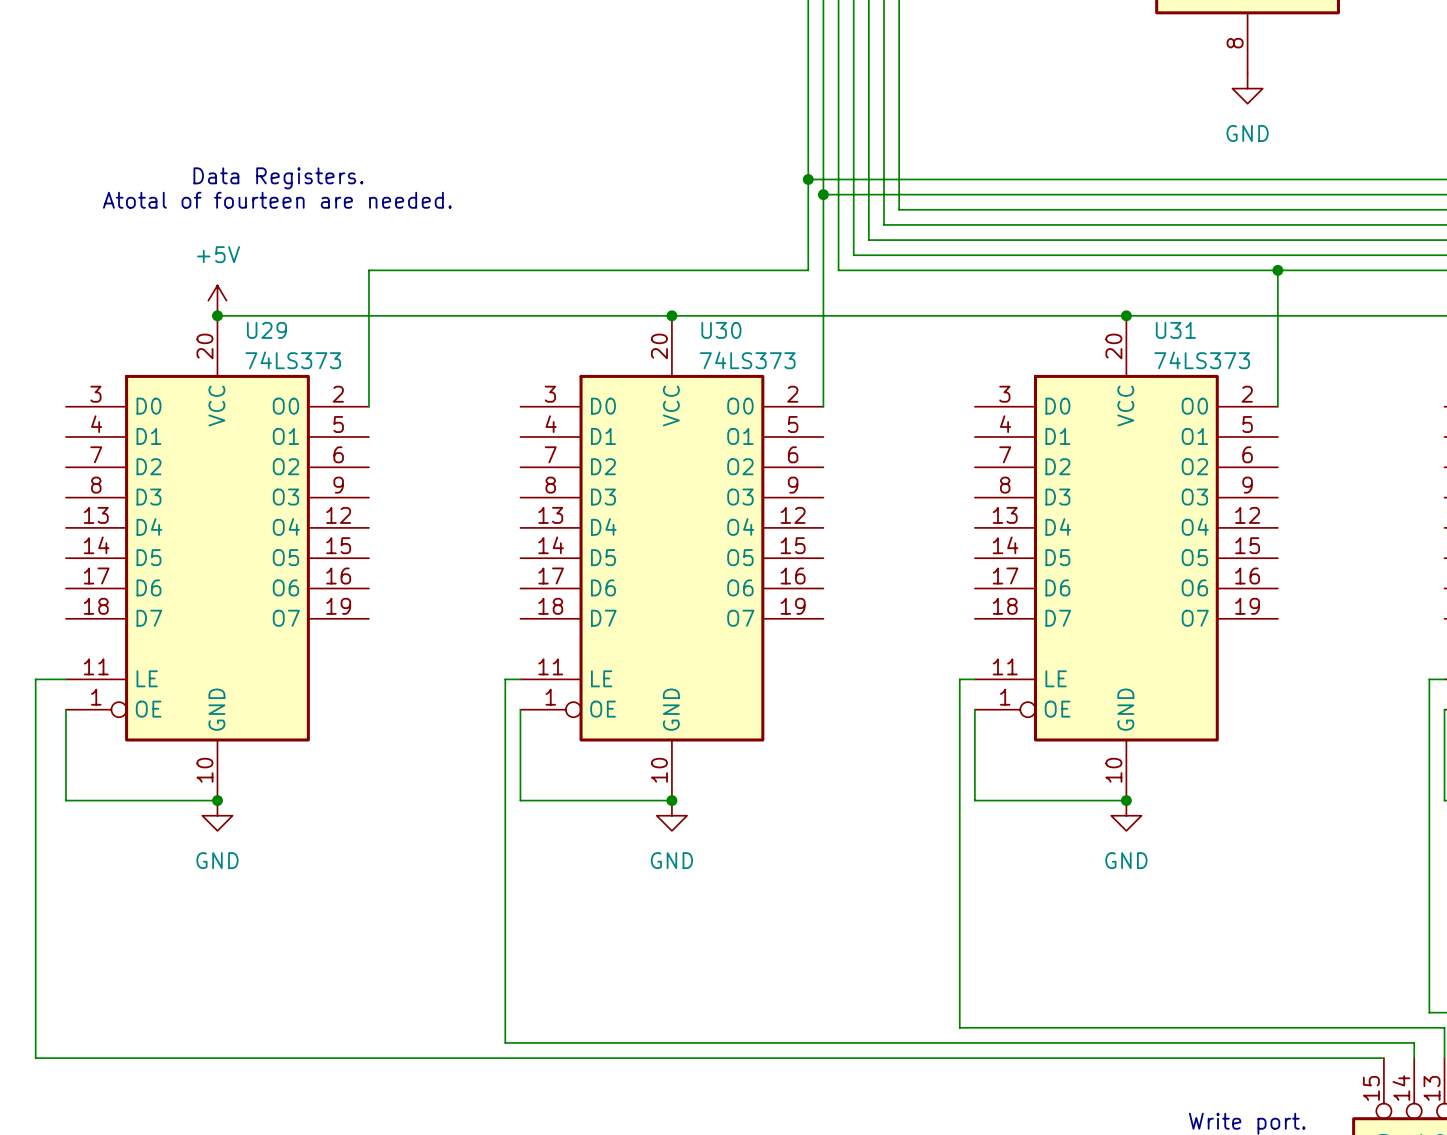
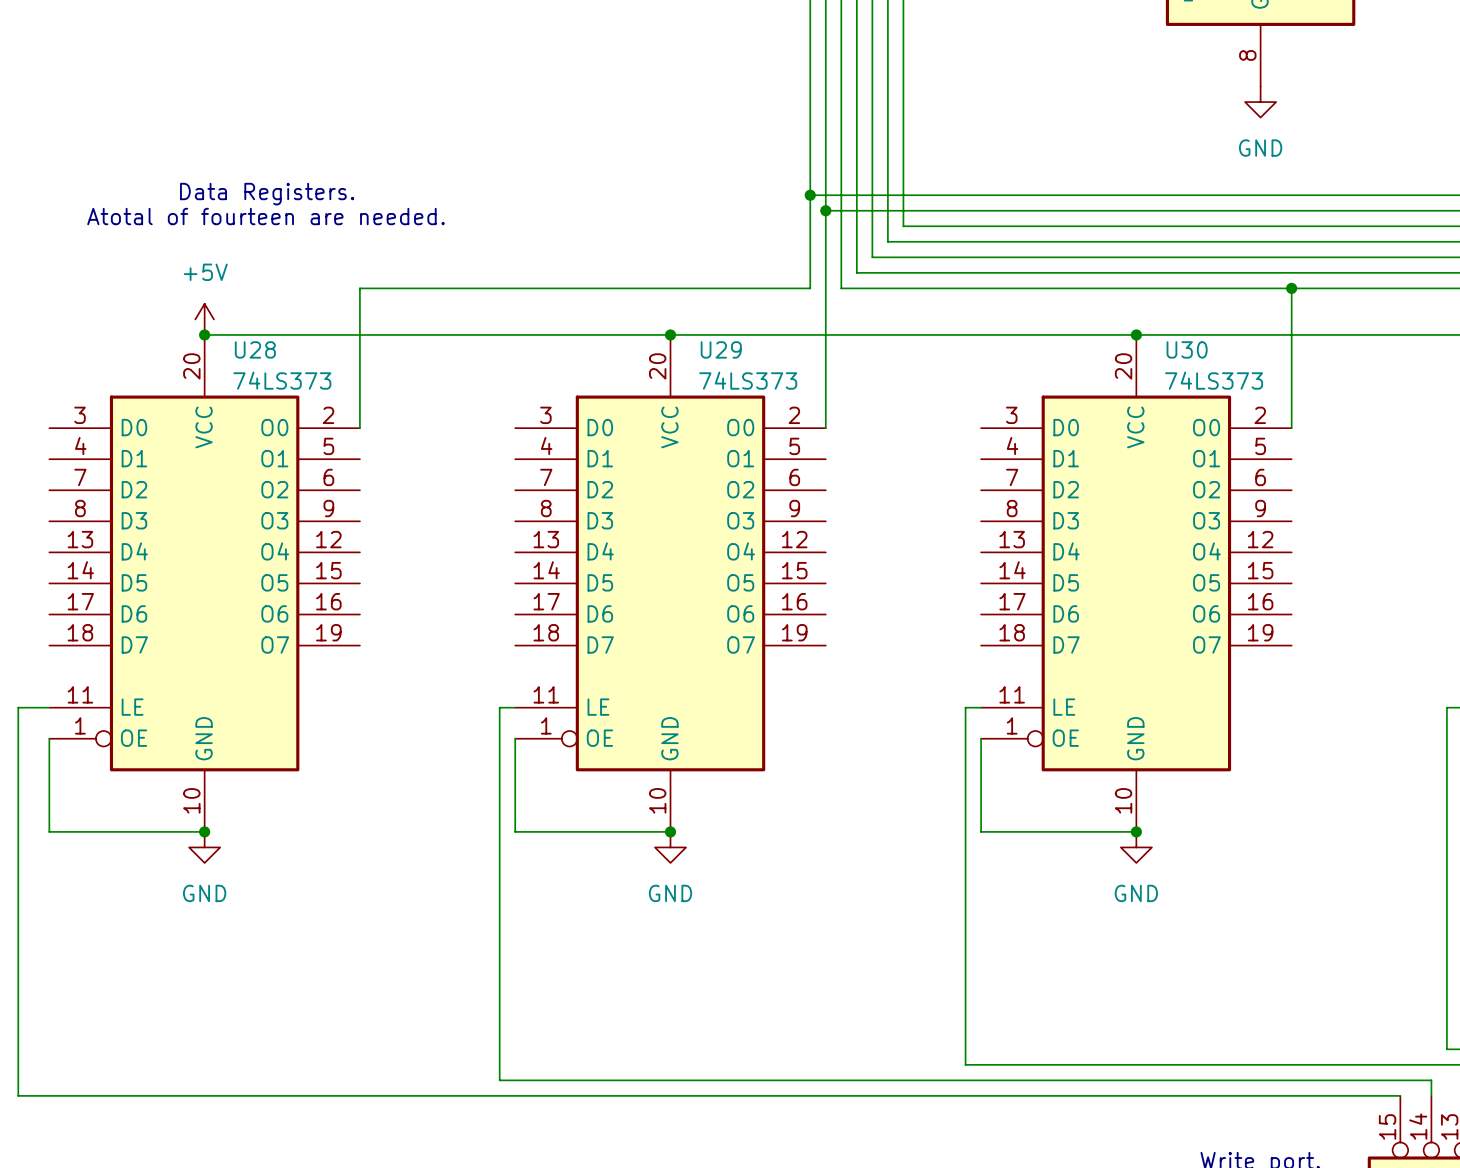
U29 name: U29 (266, 330) -> U28 (255, 349)
U30 name: U30 (721, 330) -> U29 (721, 349)
U31 name: U31 (1175, 330) -> U30 (1187, 349)

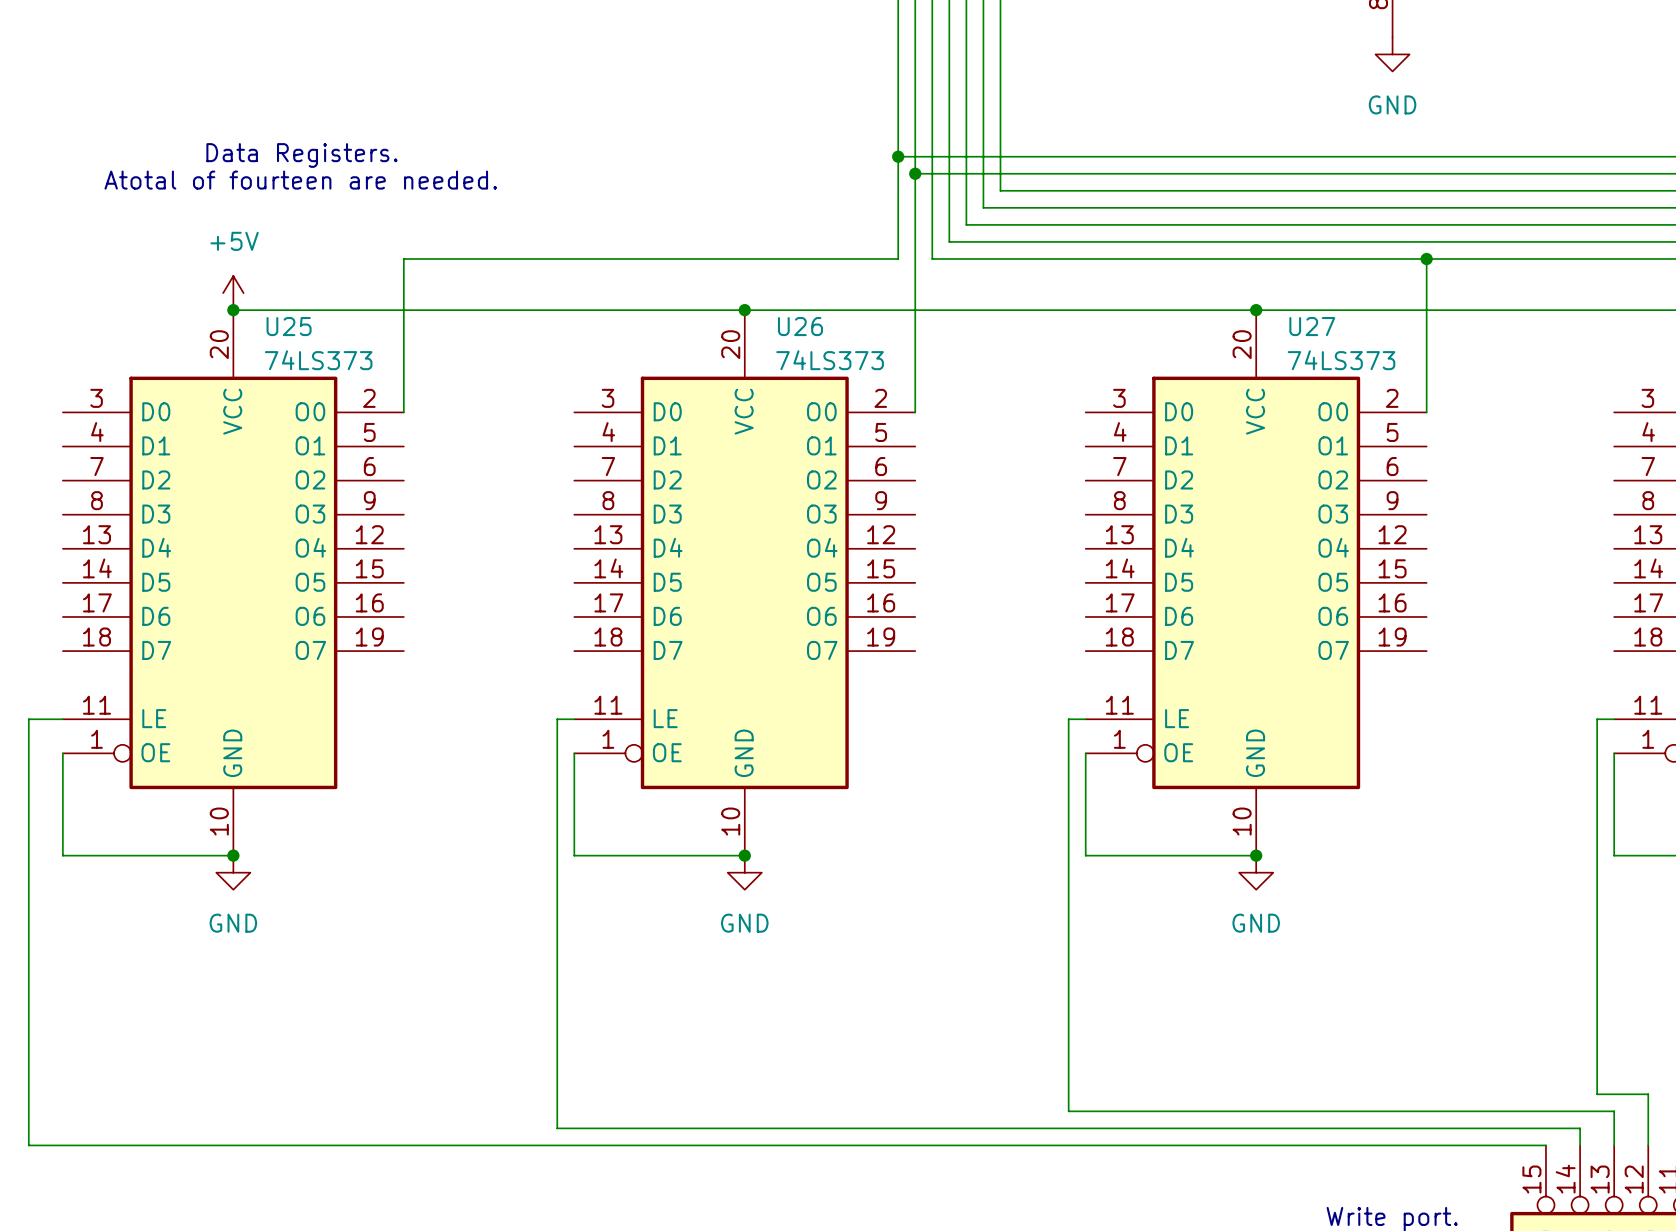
U28 name: U28 (255, 349) -> U25 (289, 326)
U29 name: U29 (721, 349) -> U26 (800, 326)
U30 name: U30 (1187, 349) -> U27 (1312, 326)

